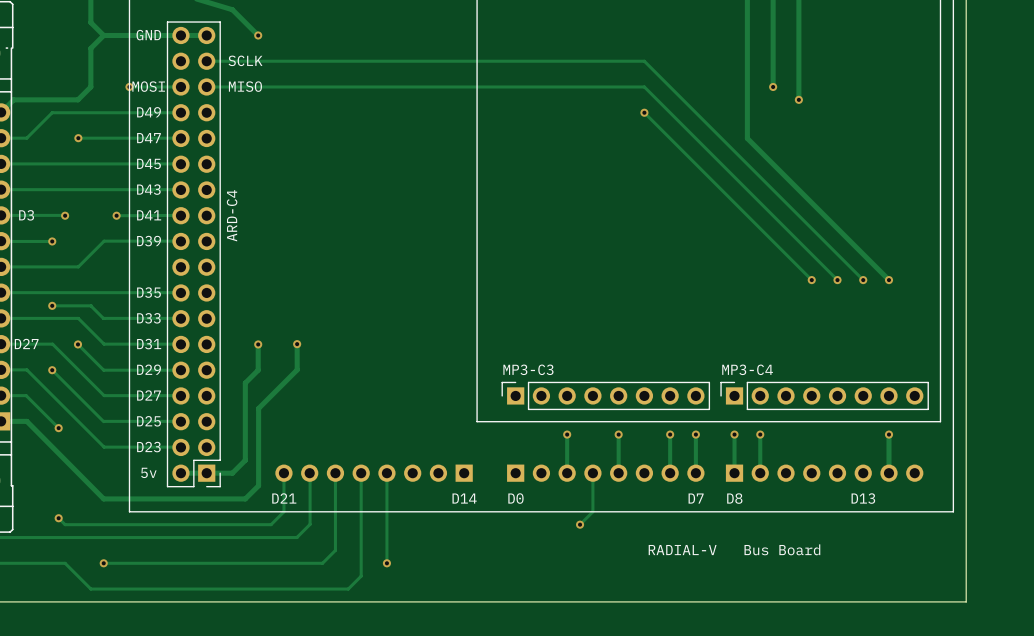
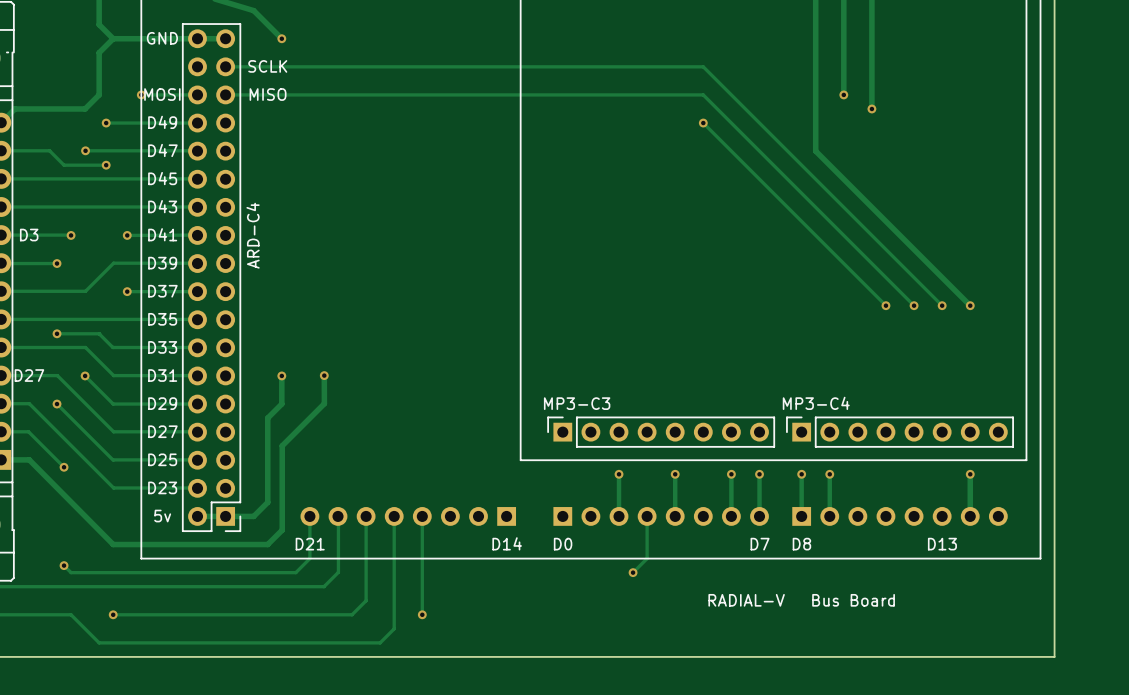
track: (97, 112) (52, 112) (26, 138) -> (106, 165) (64, 165) (49, 150) (29, 150)
via: none -> (106, 123)
via: none -> (106, 165)
text: none -> D37 (162, 291)
track: none -> (127, 291) (197, 291)
via: none -> (127, 291)

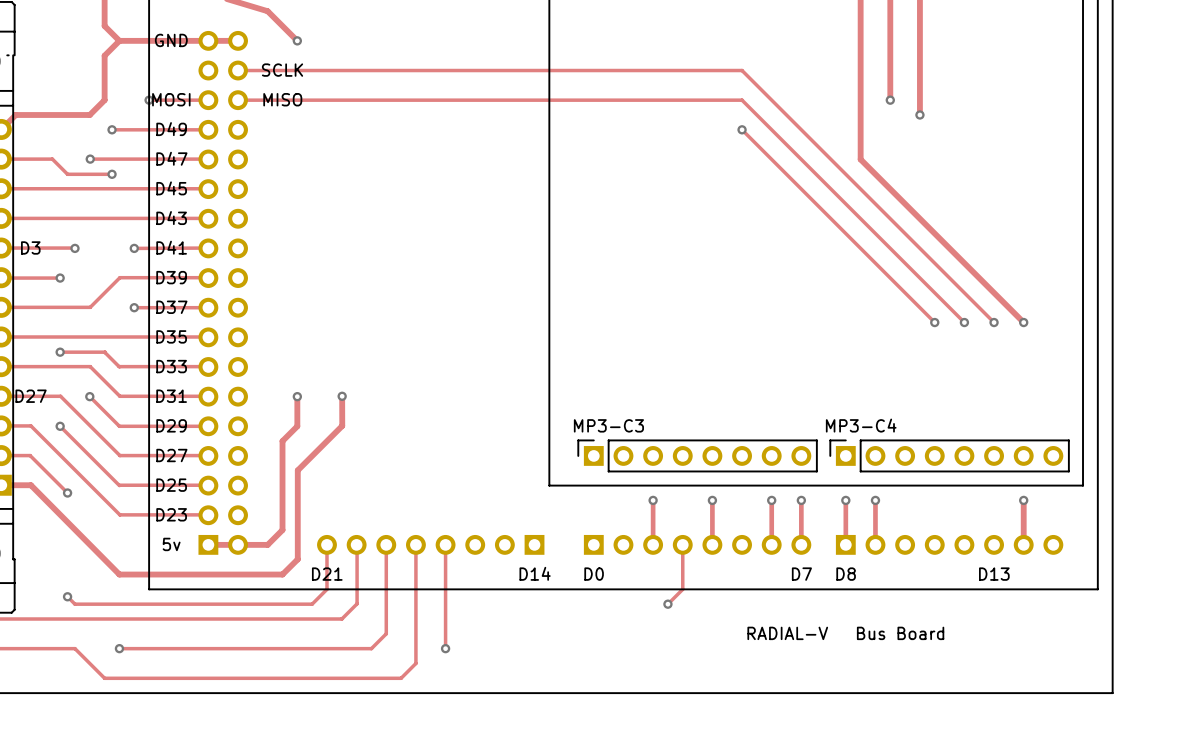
ARD-C4 side: top (211, 277) -> bottom (223, 292)

